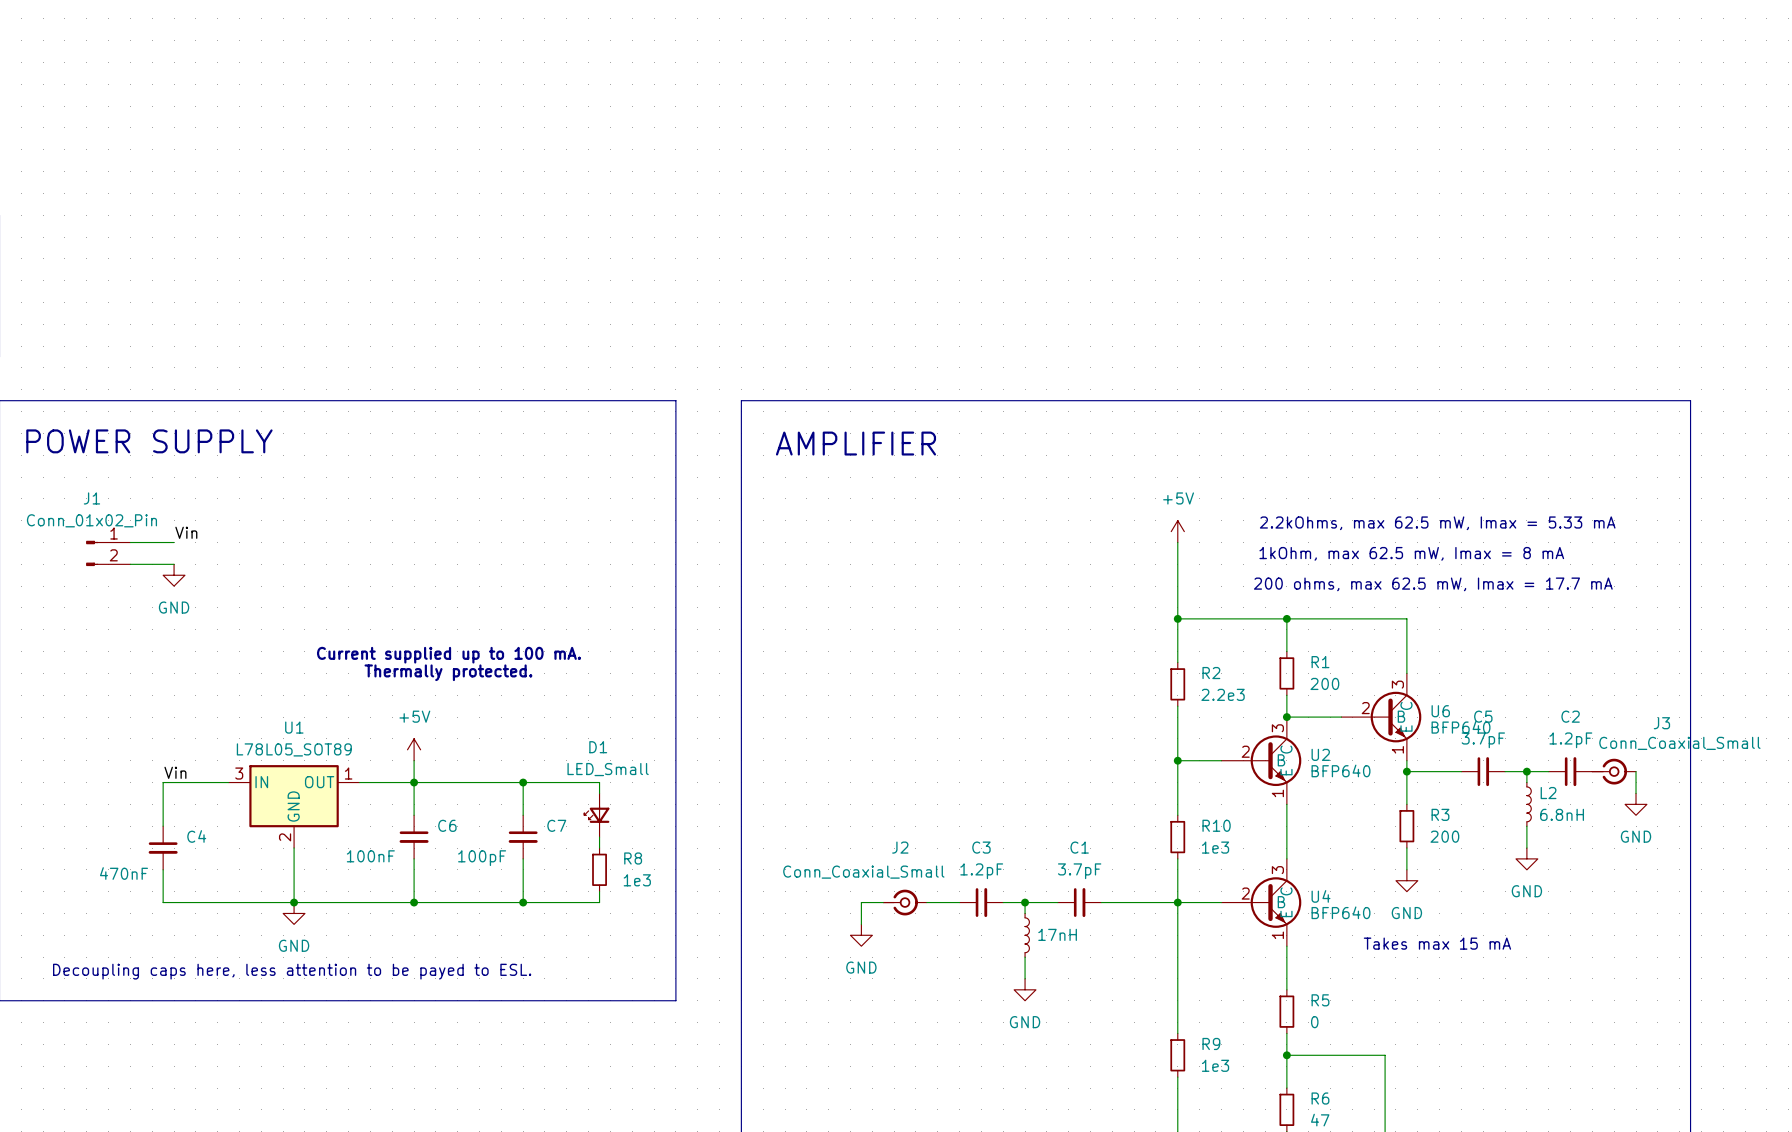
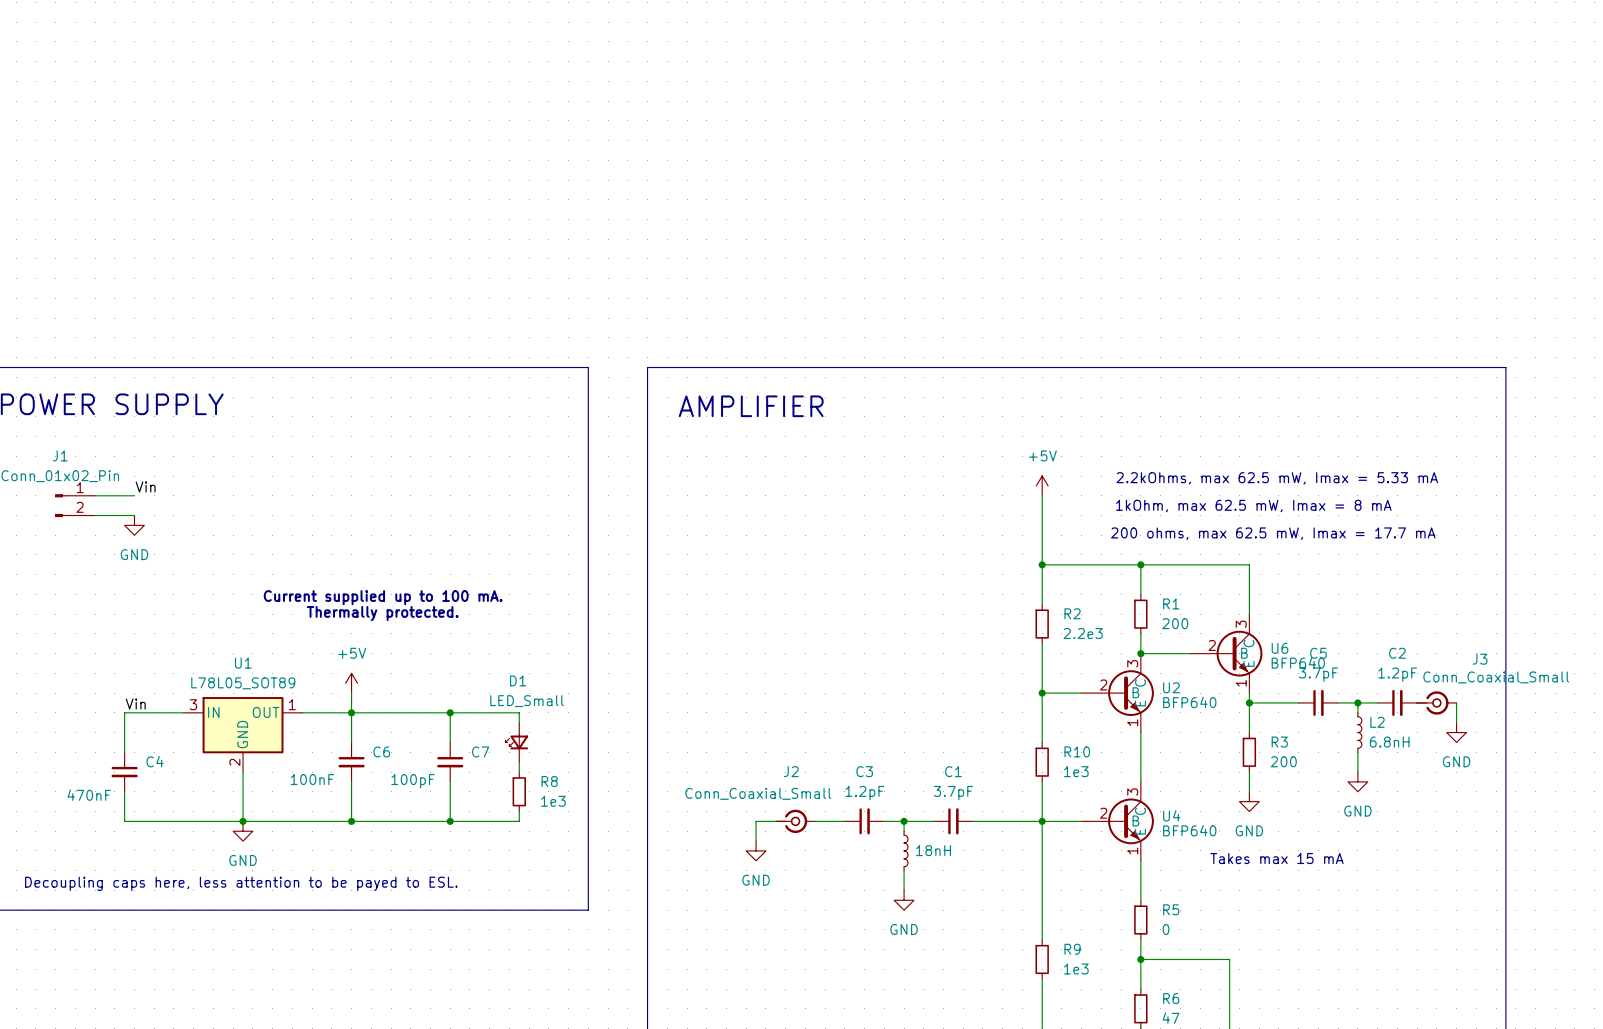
part value: 17nH (1057, 934) -> 18nH (933, 850)

